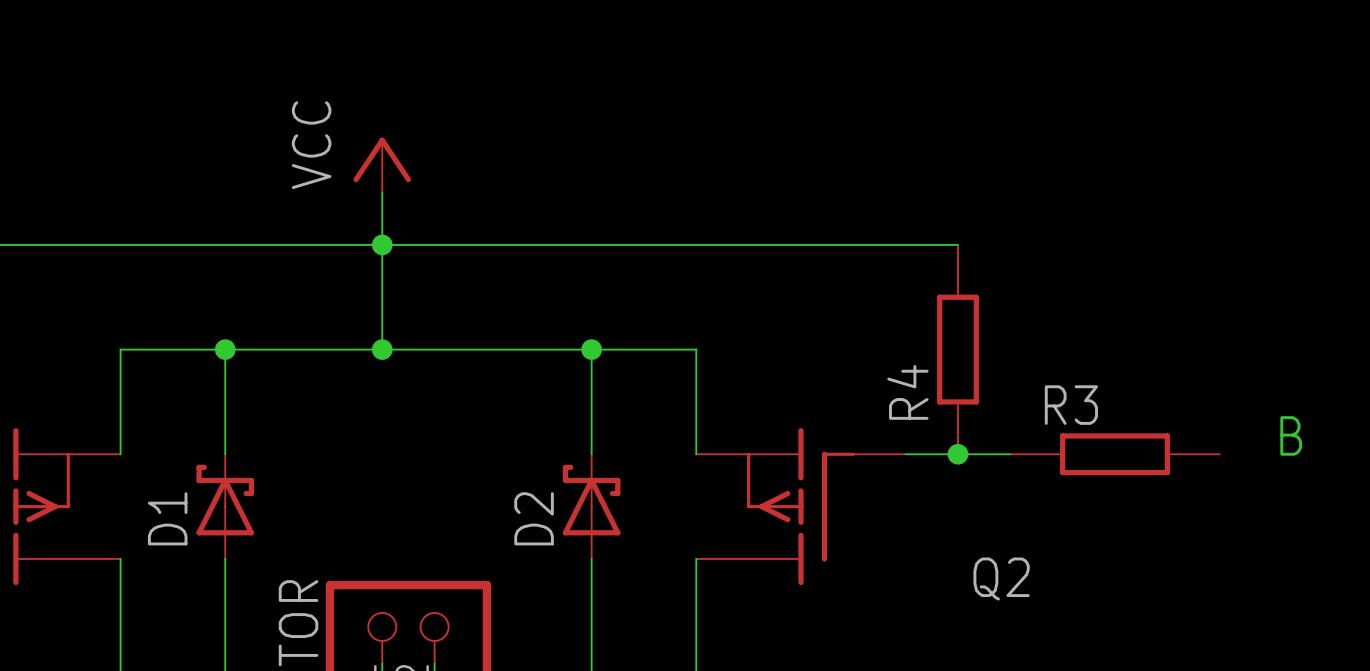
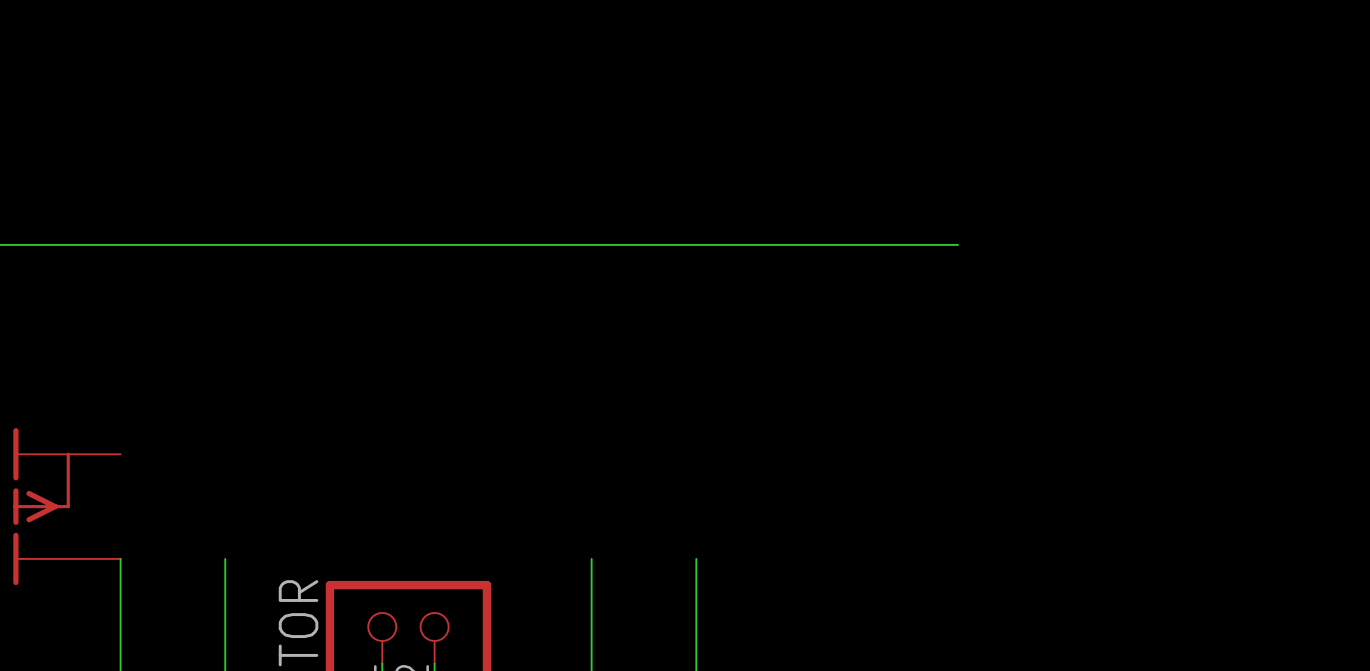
power symbol: VCC (382, 165) -> none
wire: (382, 192) (382, 349) -> none
junction: (382, 244) -> none
wire: (225, 349) (225, 454) -> none
junction: (225, 349) -> none
junction: (382, 349) -> none
wire: (591, 349) (591, 454) -> none
junction: (591, 349) -> none
R4: (957, 349) -> none
text: B (1291, 435) -> none
wire: (120, 454) (120, 349) (696, 349) (696, 454) -> none
wire: (905, 454) (1010, 454) -> none
junction: (957, 454) -> none
R3: (1114, 454) -> none
D1: (225, 506) -> none
D2: (591, 506) -> none
Q2: (800, 506) -> none

